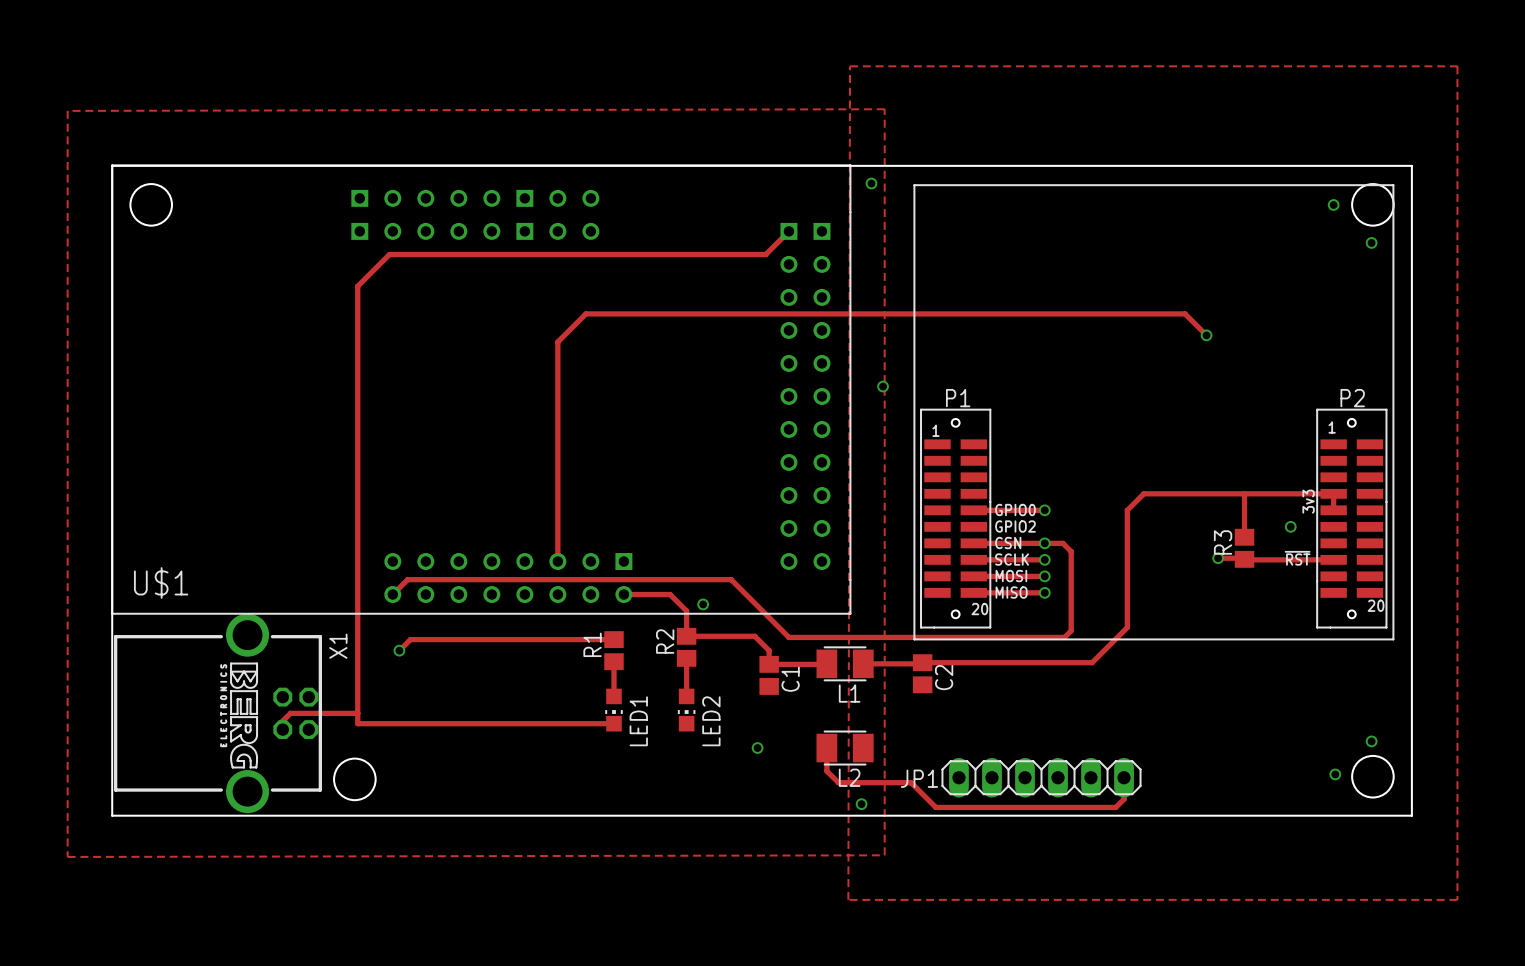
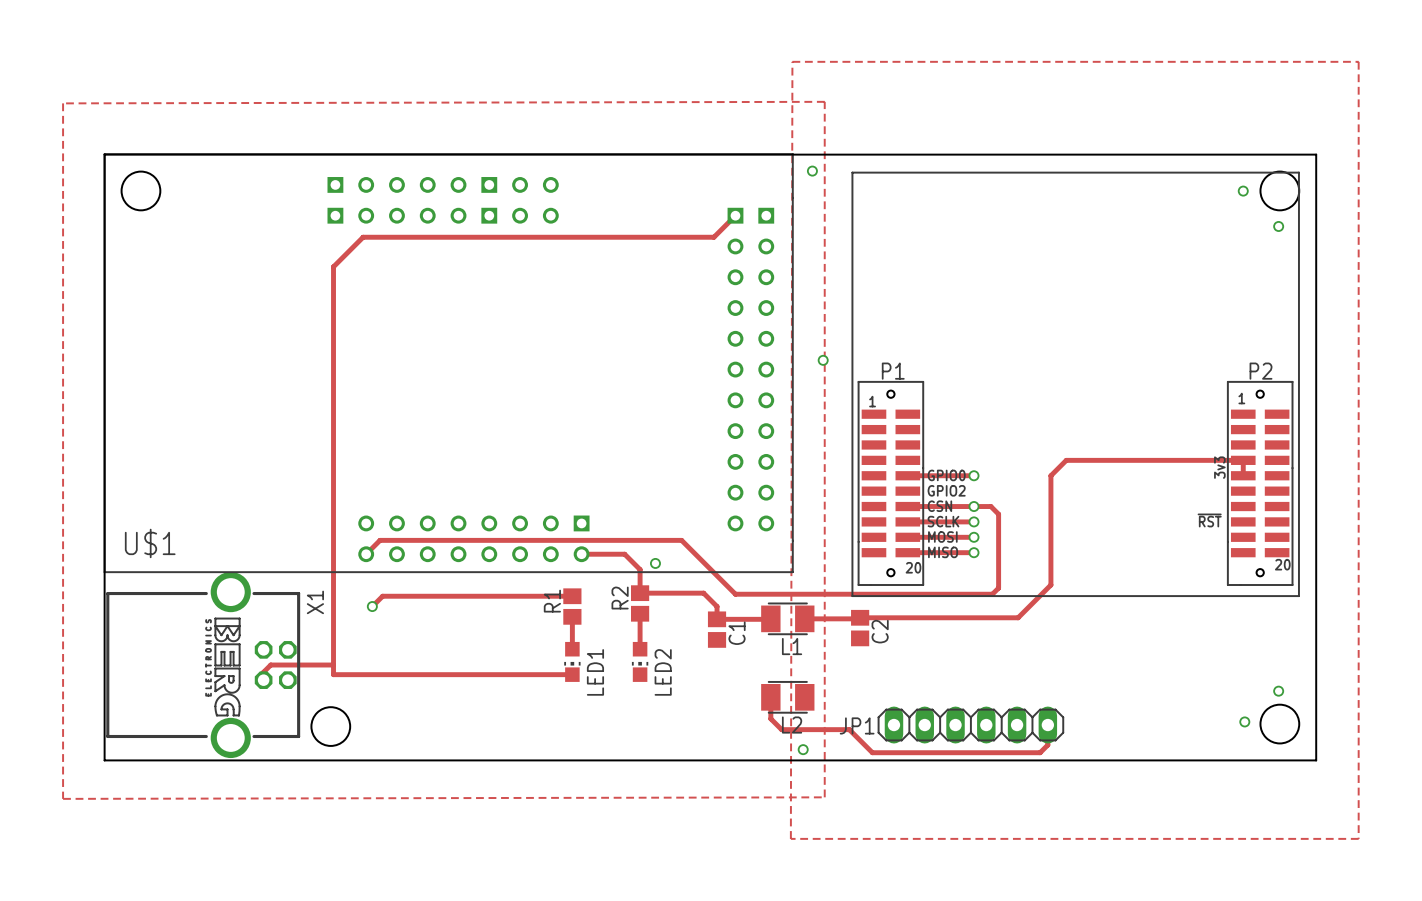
track: (1206, 335) (1185, 313) (585, 313) (557, 341) (557, 561) -> none
via: (1206, 335) -> none
track: (1244, 493) (1244, 537) -> none
via: (1290, 526) -> none
R3: (1244, 548) -> none
track: (1218, 558) (1333, 559) -> none
via: (1218, 558) -> none
via: (757, 748) -> none

